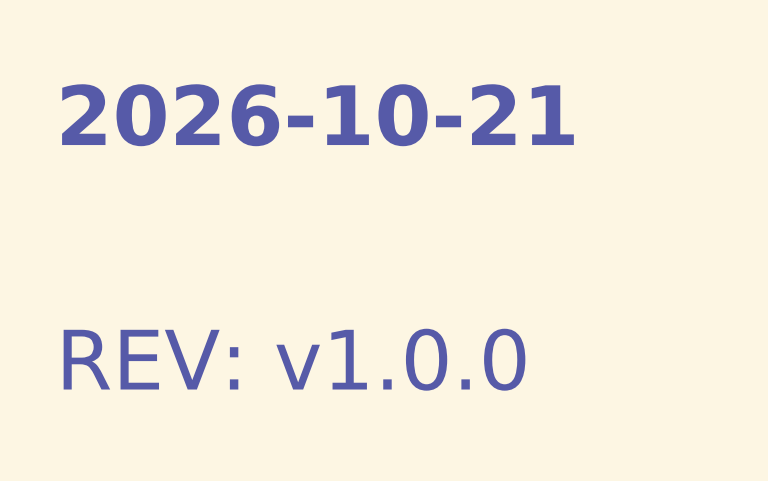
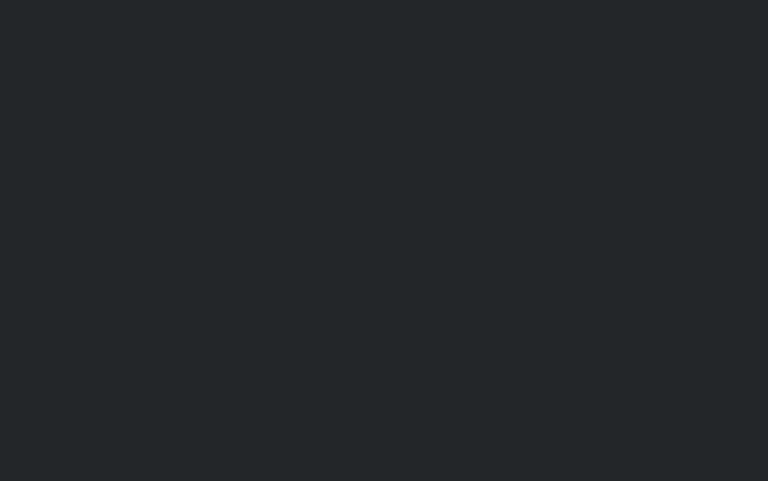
text: 2026-10-21 (317, 115) -> none
text: REV: v1.0.0 (294, 359) -> none

